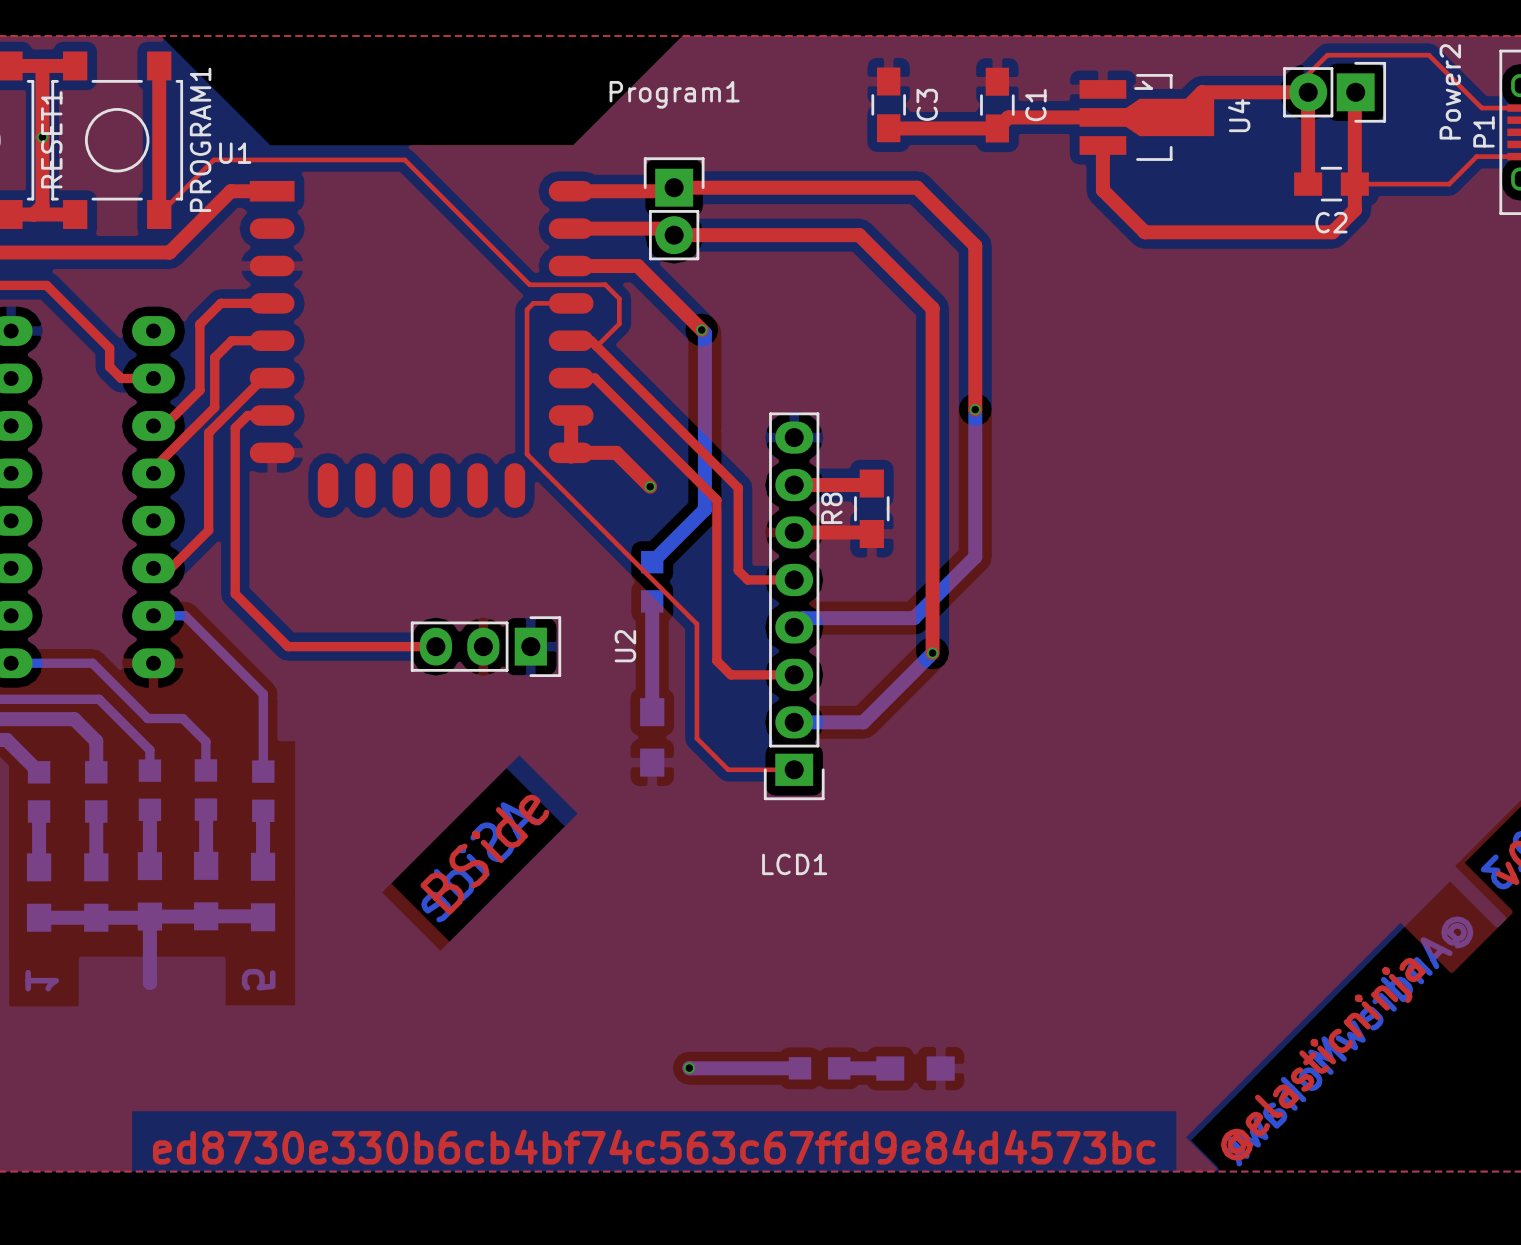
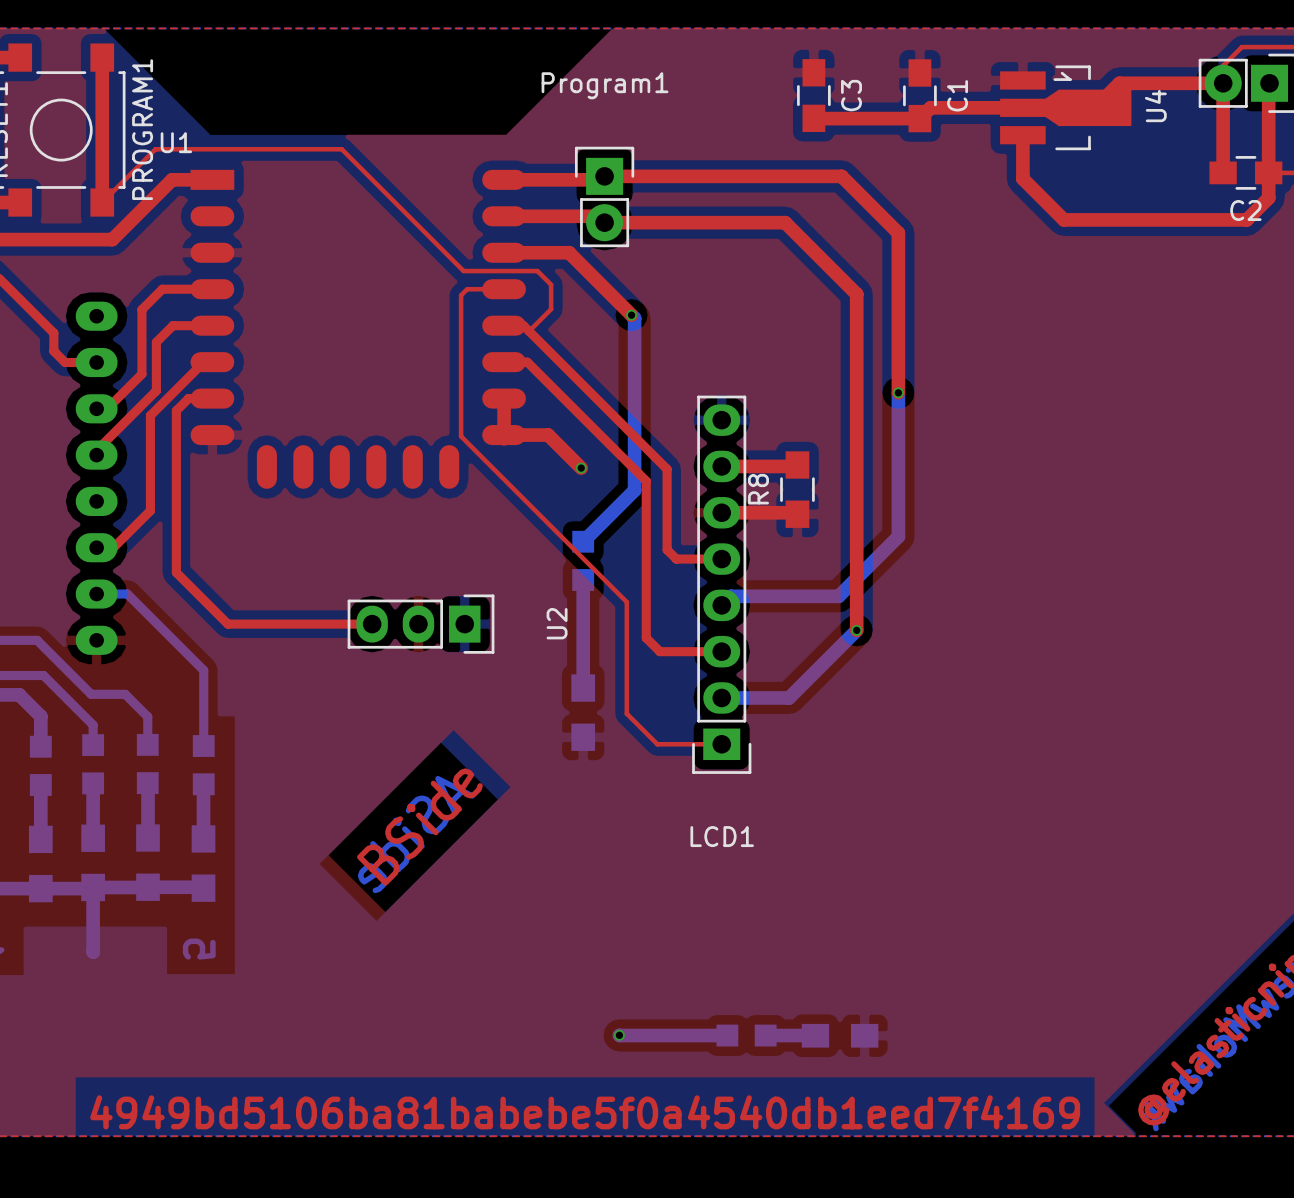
text: ed8730e330b6cb4bf74c563c67ffd9e84d4573bc (654, 1147) -> 4949bd5106ba81babebe5f0a4540db1eed7f4169 (585, 1112)

